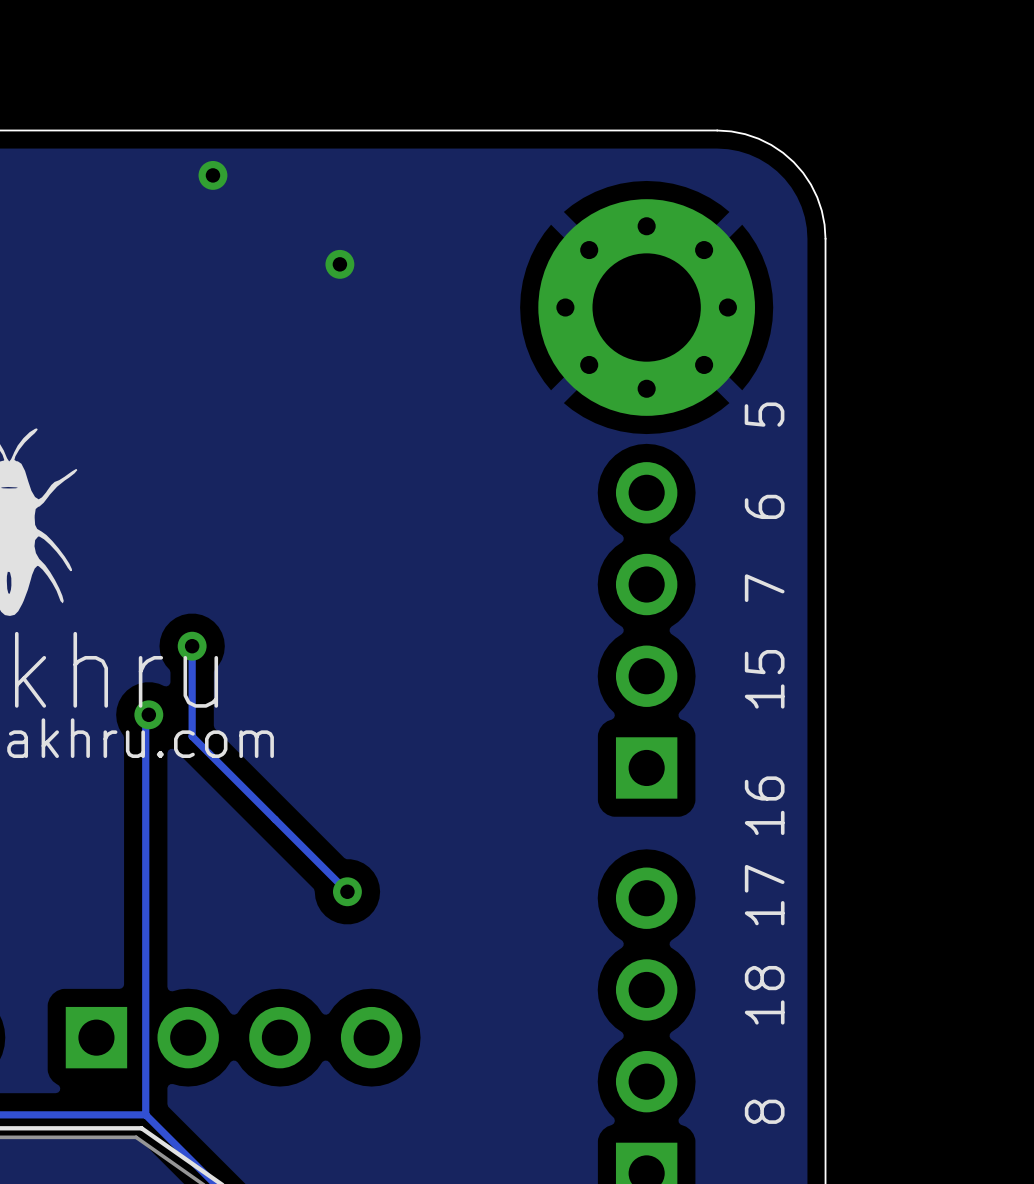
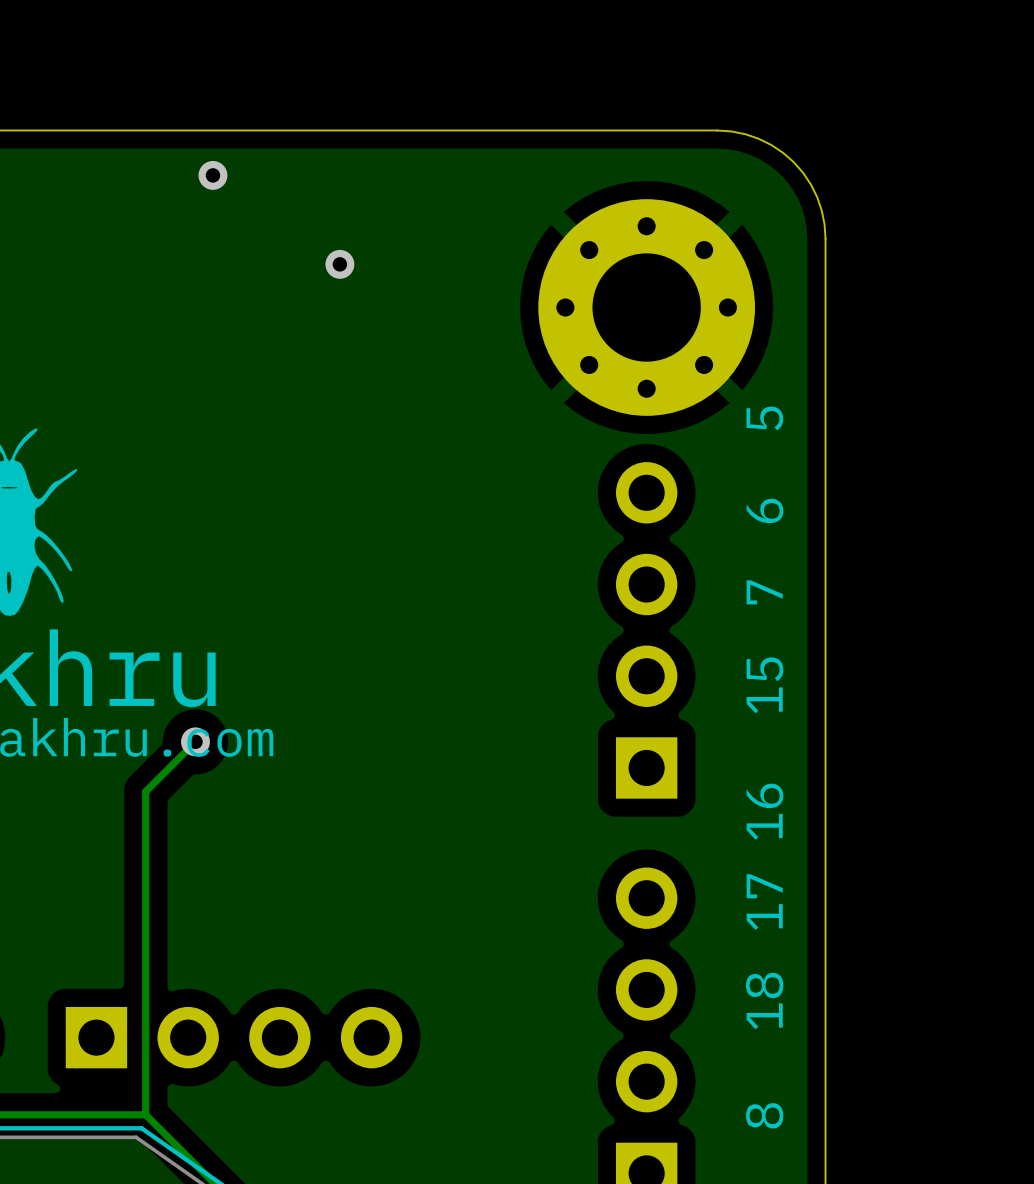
track: (192, 646) (192, 736) (347, 891) -> none
via: (192, 646) -> none
track: (148, 714) (145, 717) (145, 791) -> (195, 741) (145, 791)
via: (148, 714) -> none
via: none -> (195, 741)
via: (347, 891) -> none

